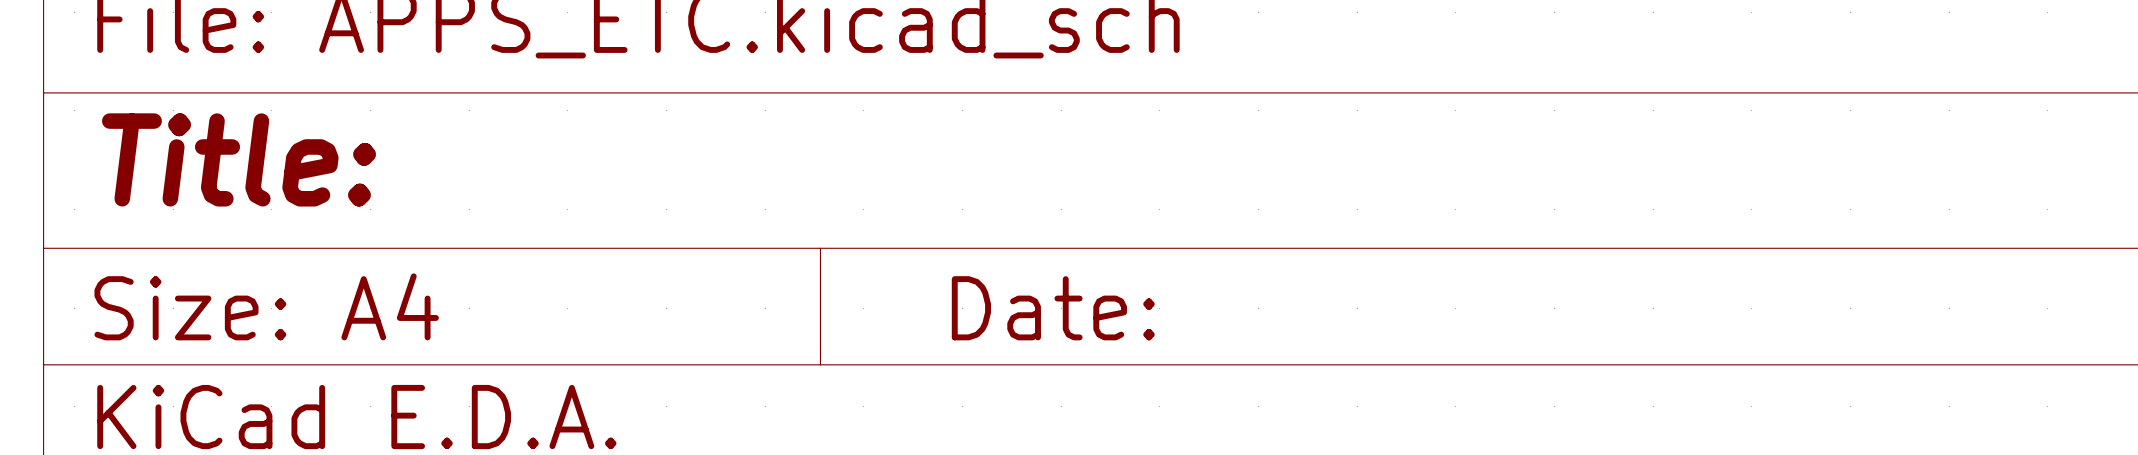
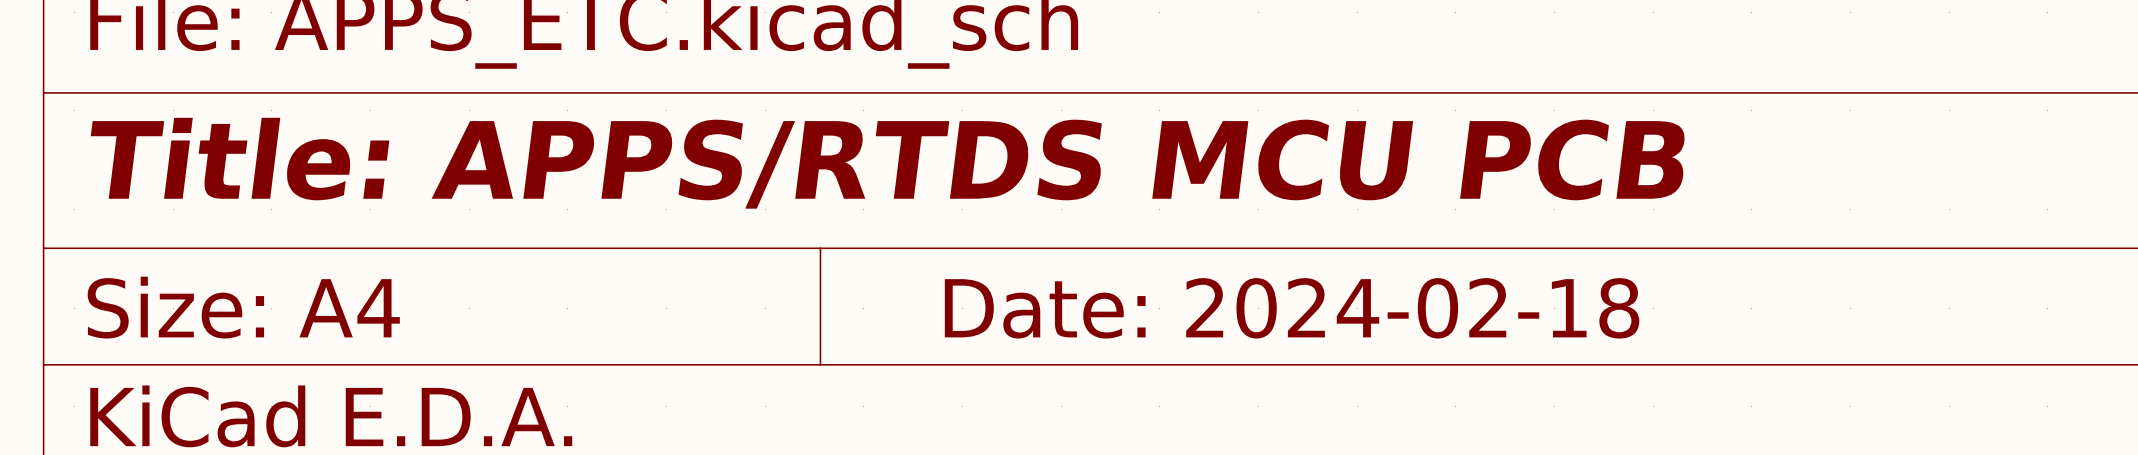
title block: Title: (239, 159) -> Title: APPS/RTDS MCU PCB (888, 163)
title block: Date: (1053, 308) -> Date: 2024-02-18 (1292, 308)

